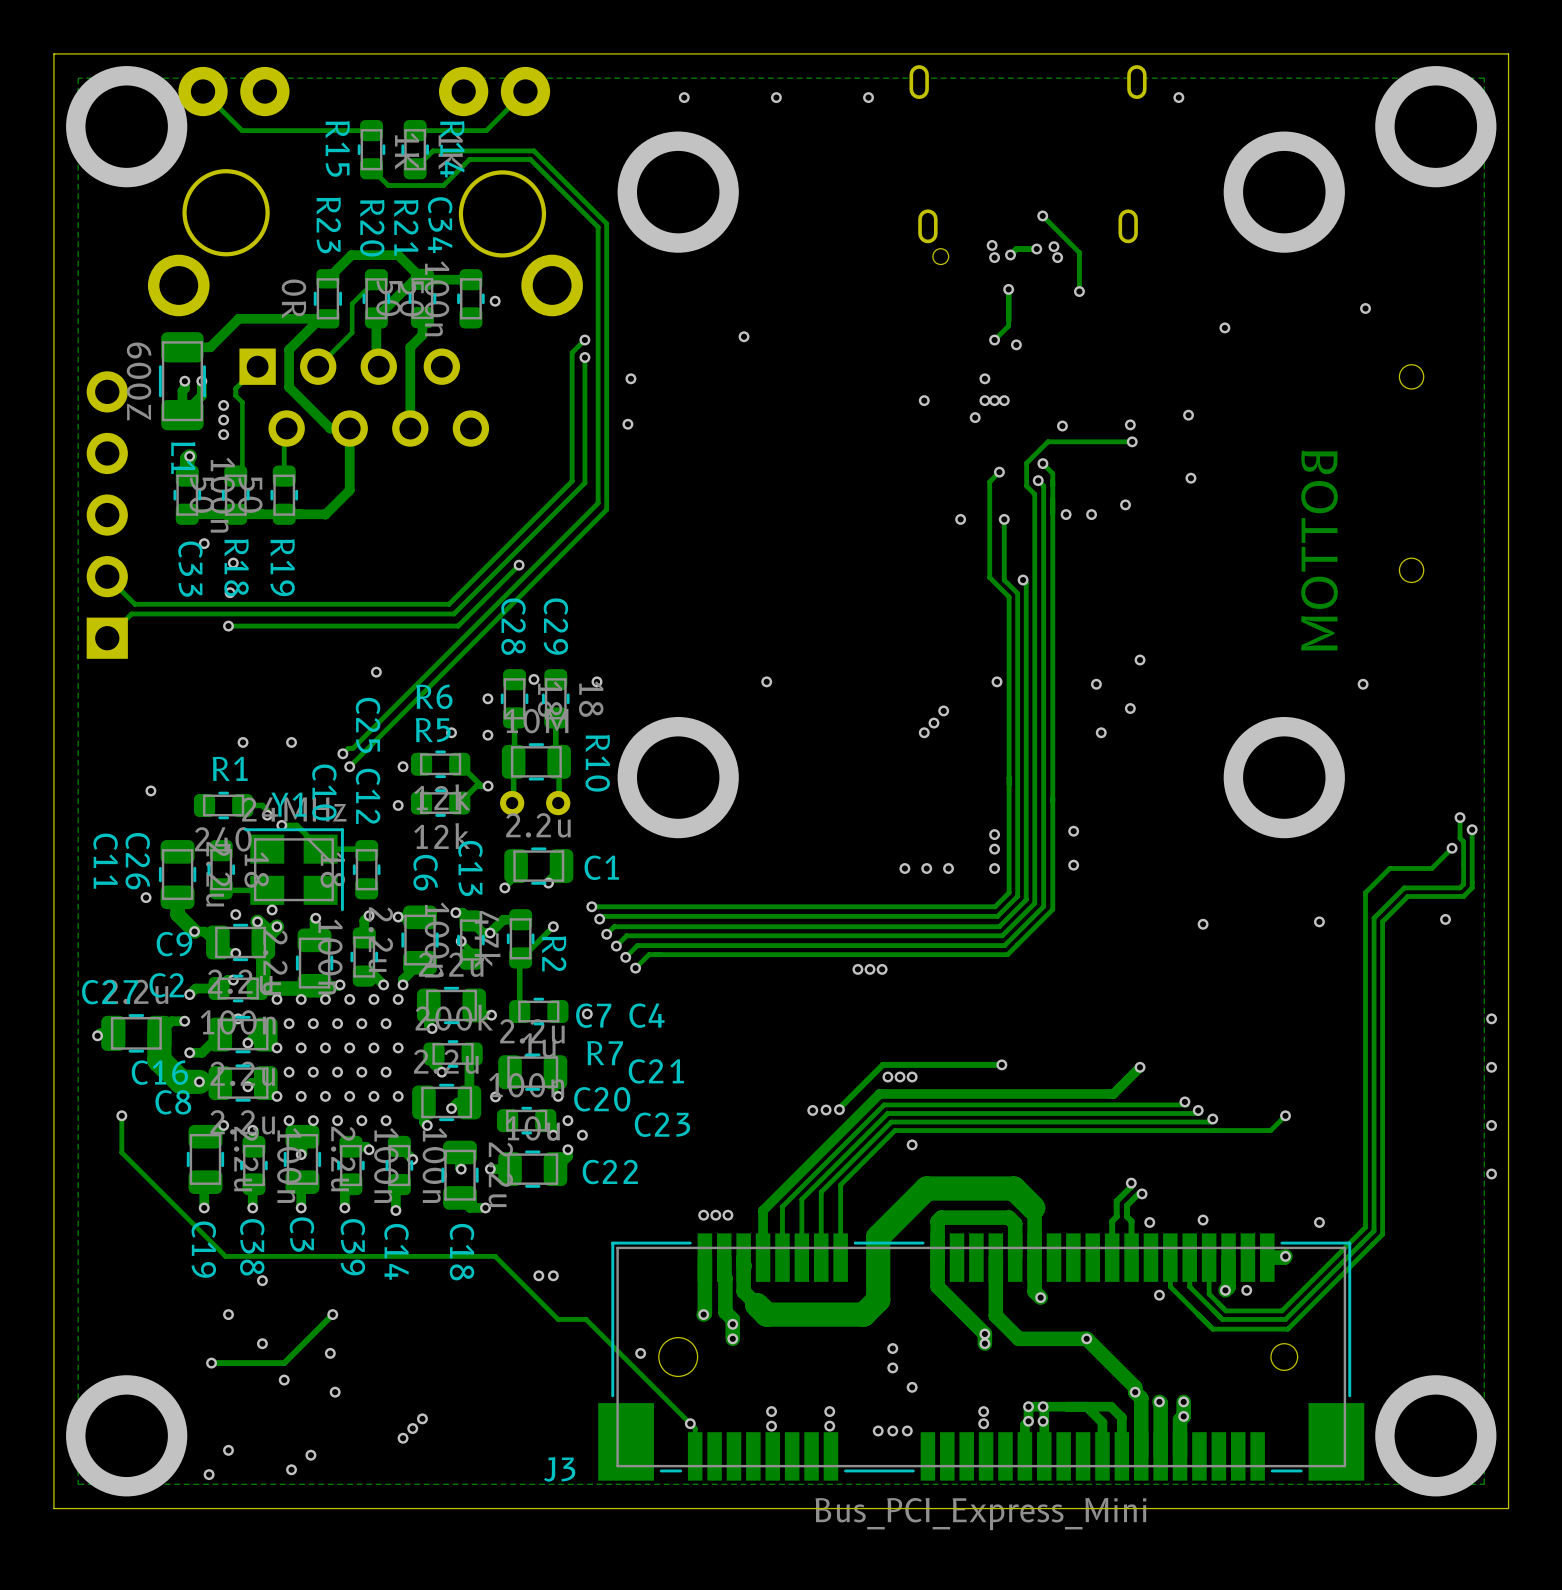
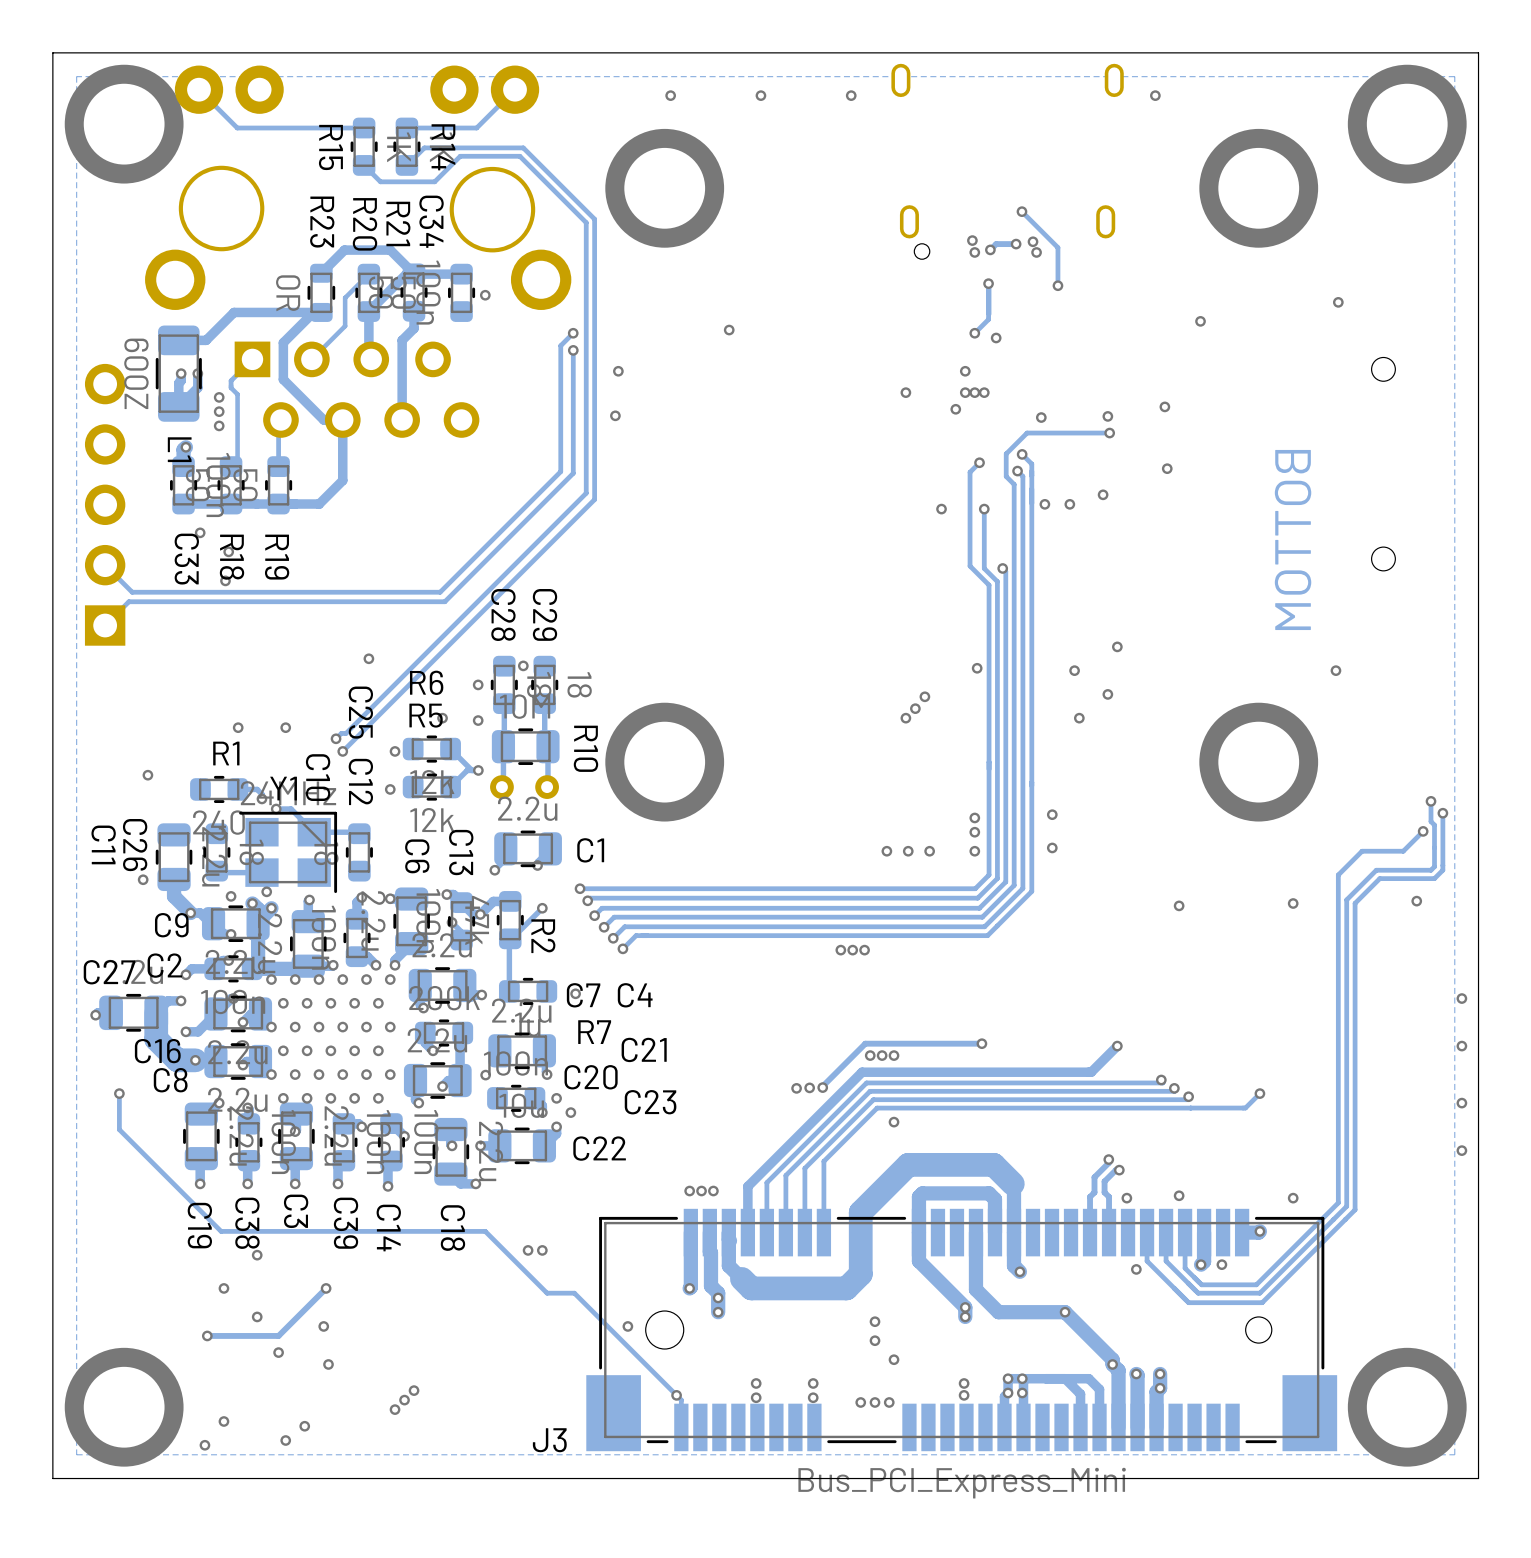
track: (519, 565) (458, 626) (228, 626) -> none
via: (519, 565) -> none
via: (228, 626) -> none
via: (596, 681) -> none
via: (766, 681) -> none

